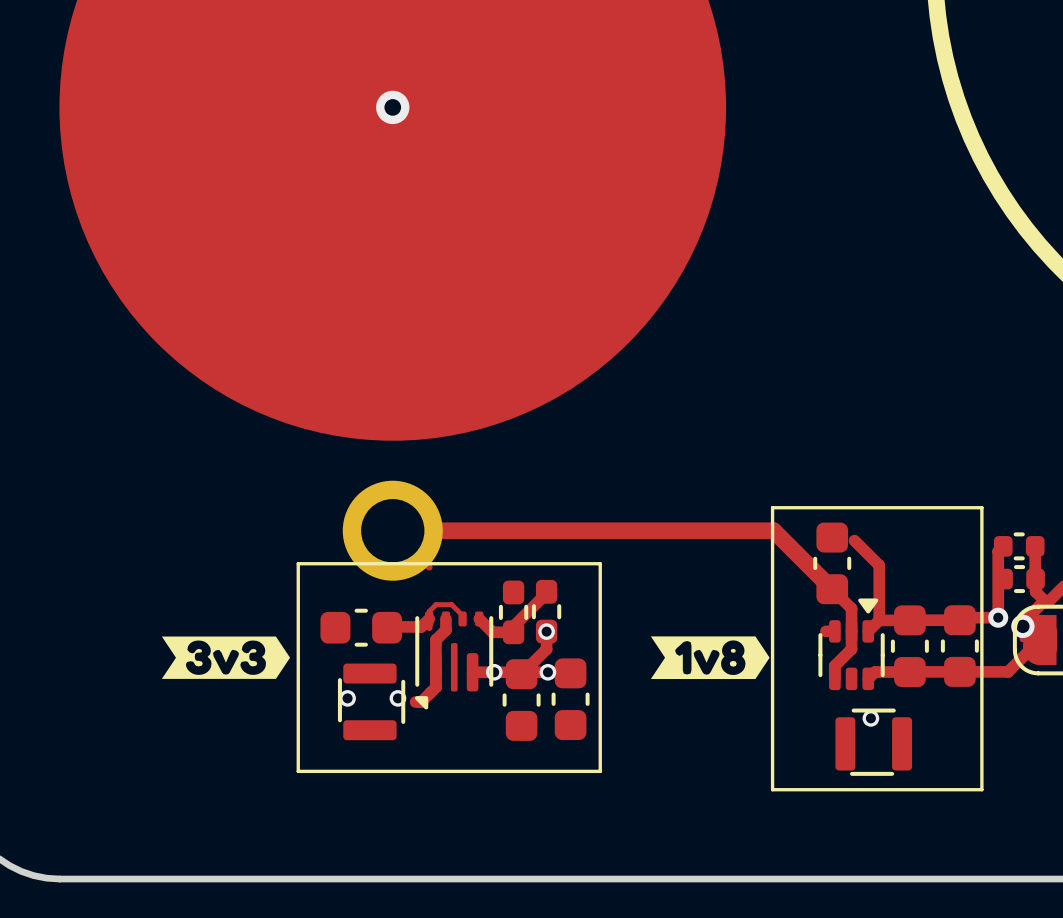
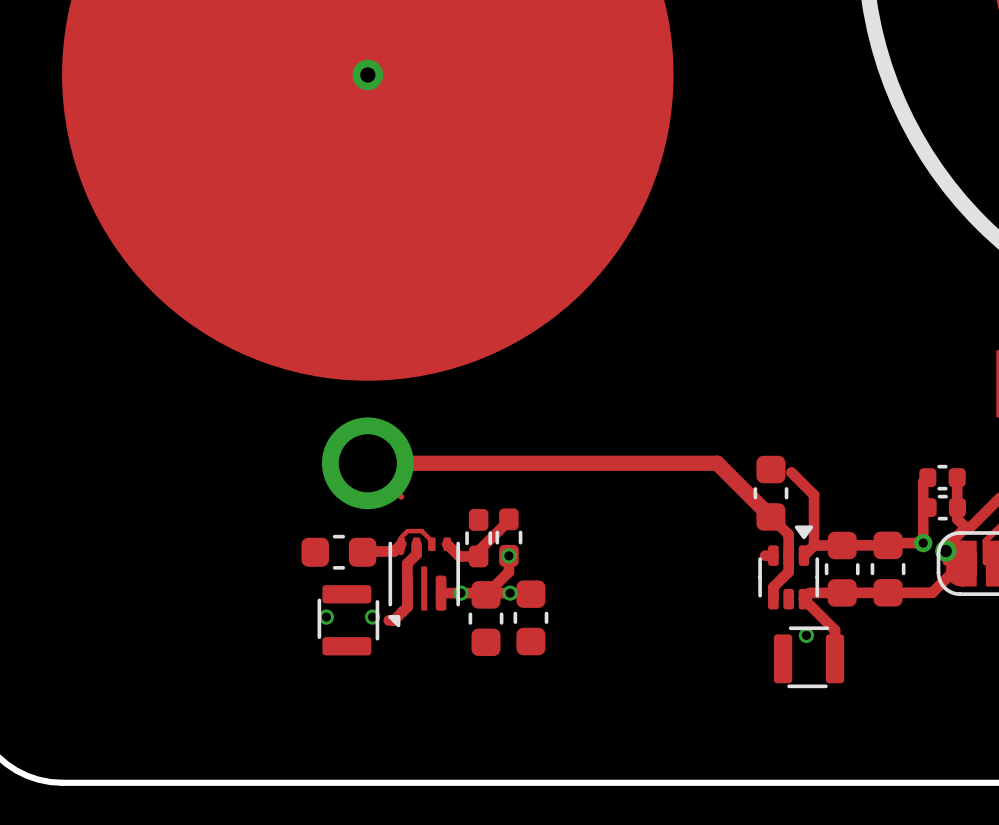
line: (772, 507) (981, 507) (981, 789) (772, 789) (772, 507) -> none
line: (298, 563) (600, 563) (600, 771) (298, 771) (298, 563) -> none
drawing: [161, 636, 291, 679] -> none
drawing: [650, 636, 770, 680] -> none
track: none -> (803, 599) (835, 630) (835, 658)

